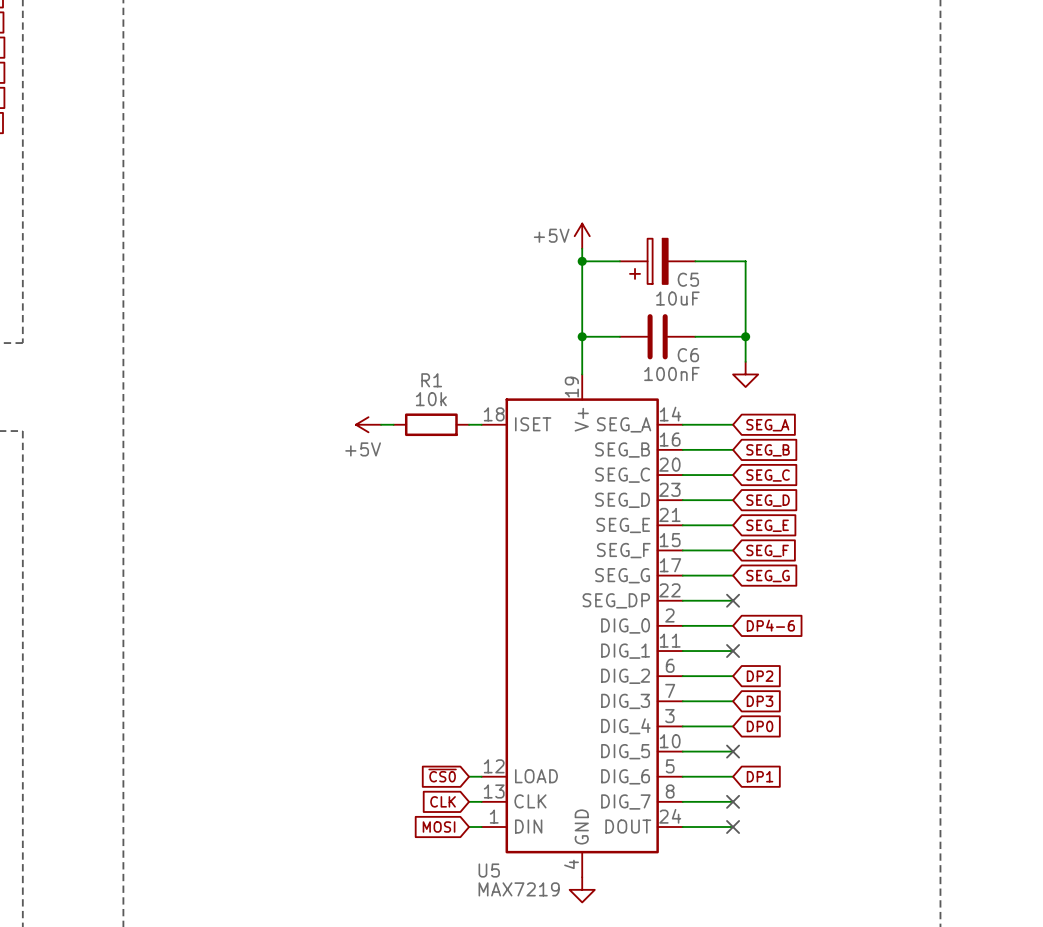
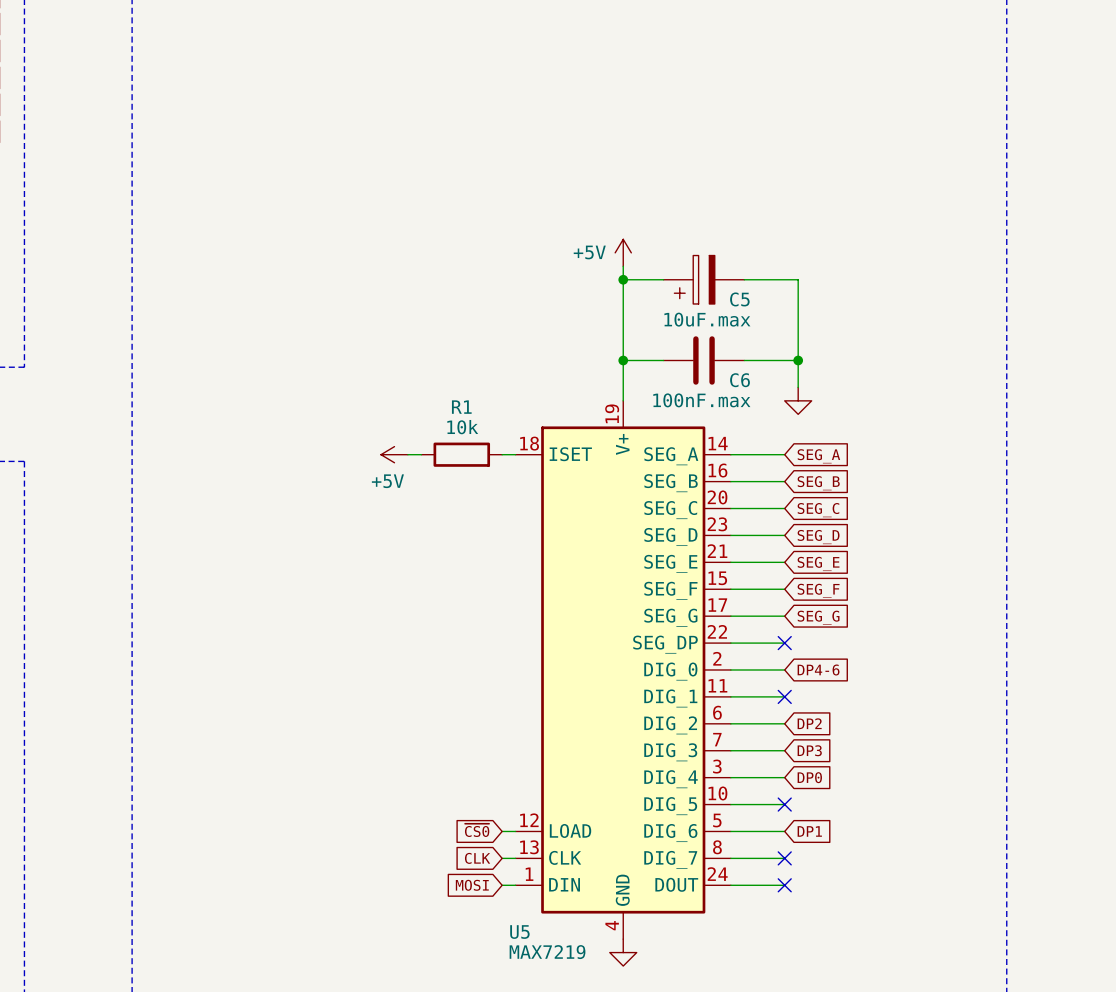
C5 value: 10uF (677, 298) -> 10uF.max (707, 319)
C6 value: 100nF (671, 374) -> 100nF.max (701, 400)

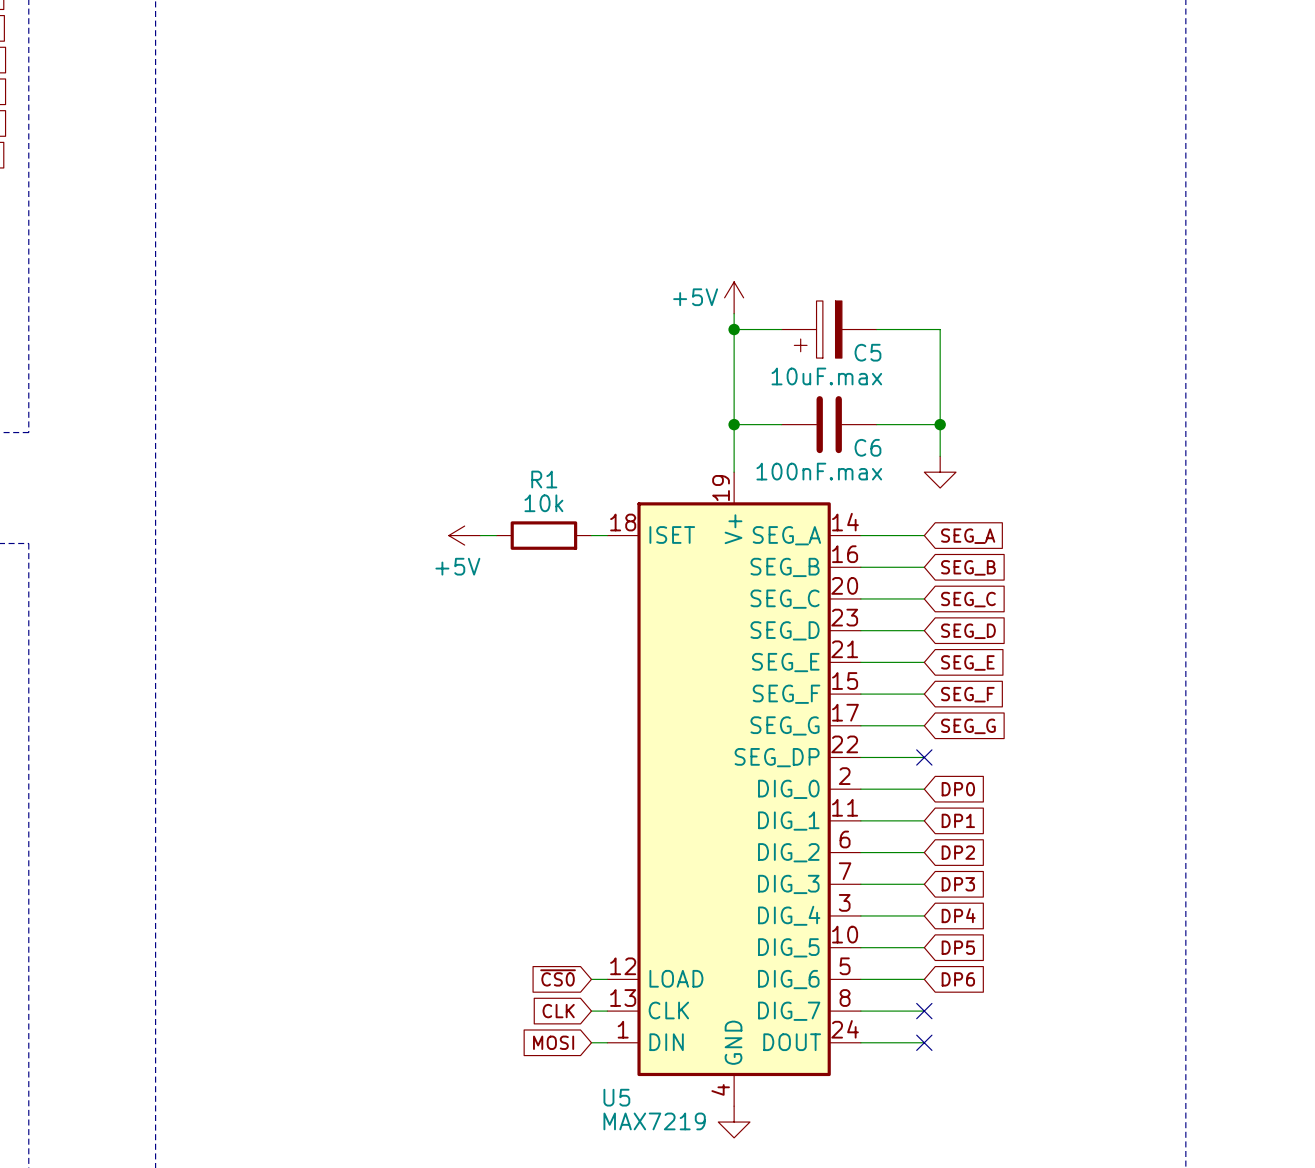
global label: DP4-6 (818, 670) -> DP0 (958, 789)
no-connect mark: (784, 696) -> none
global label: none -> DP1 (958, 820)
global label: DP0 (809, 777) -> DP4 (958, 915)
no-connect mark: (784, 804) -> none
global label: none -> DP5 (958, 947)
global label: DP1 (809, 831) -> DP6 (958, 979)

